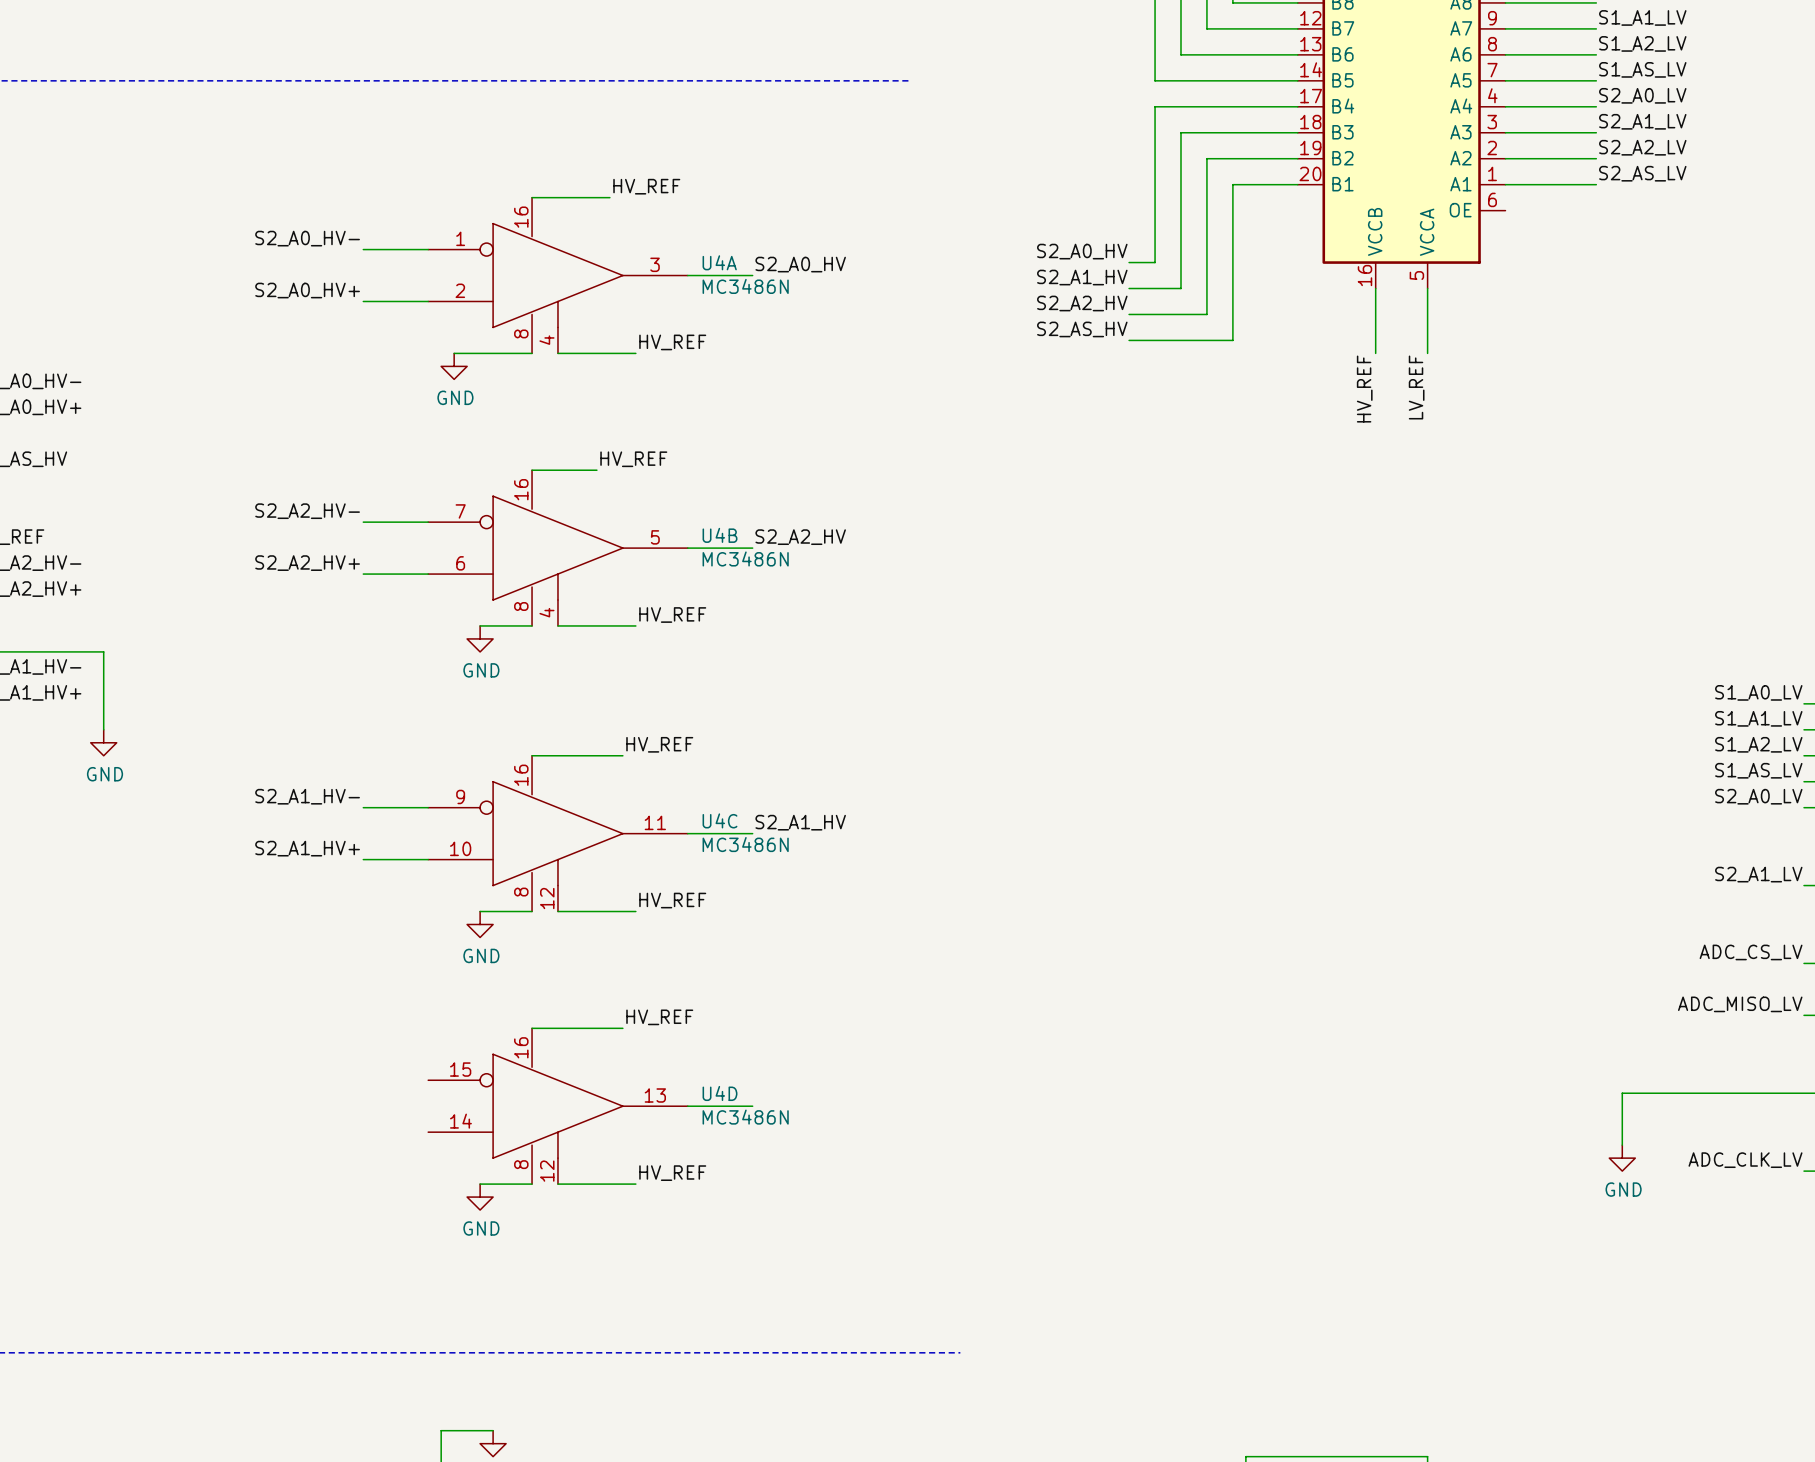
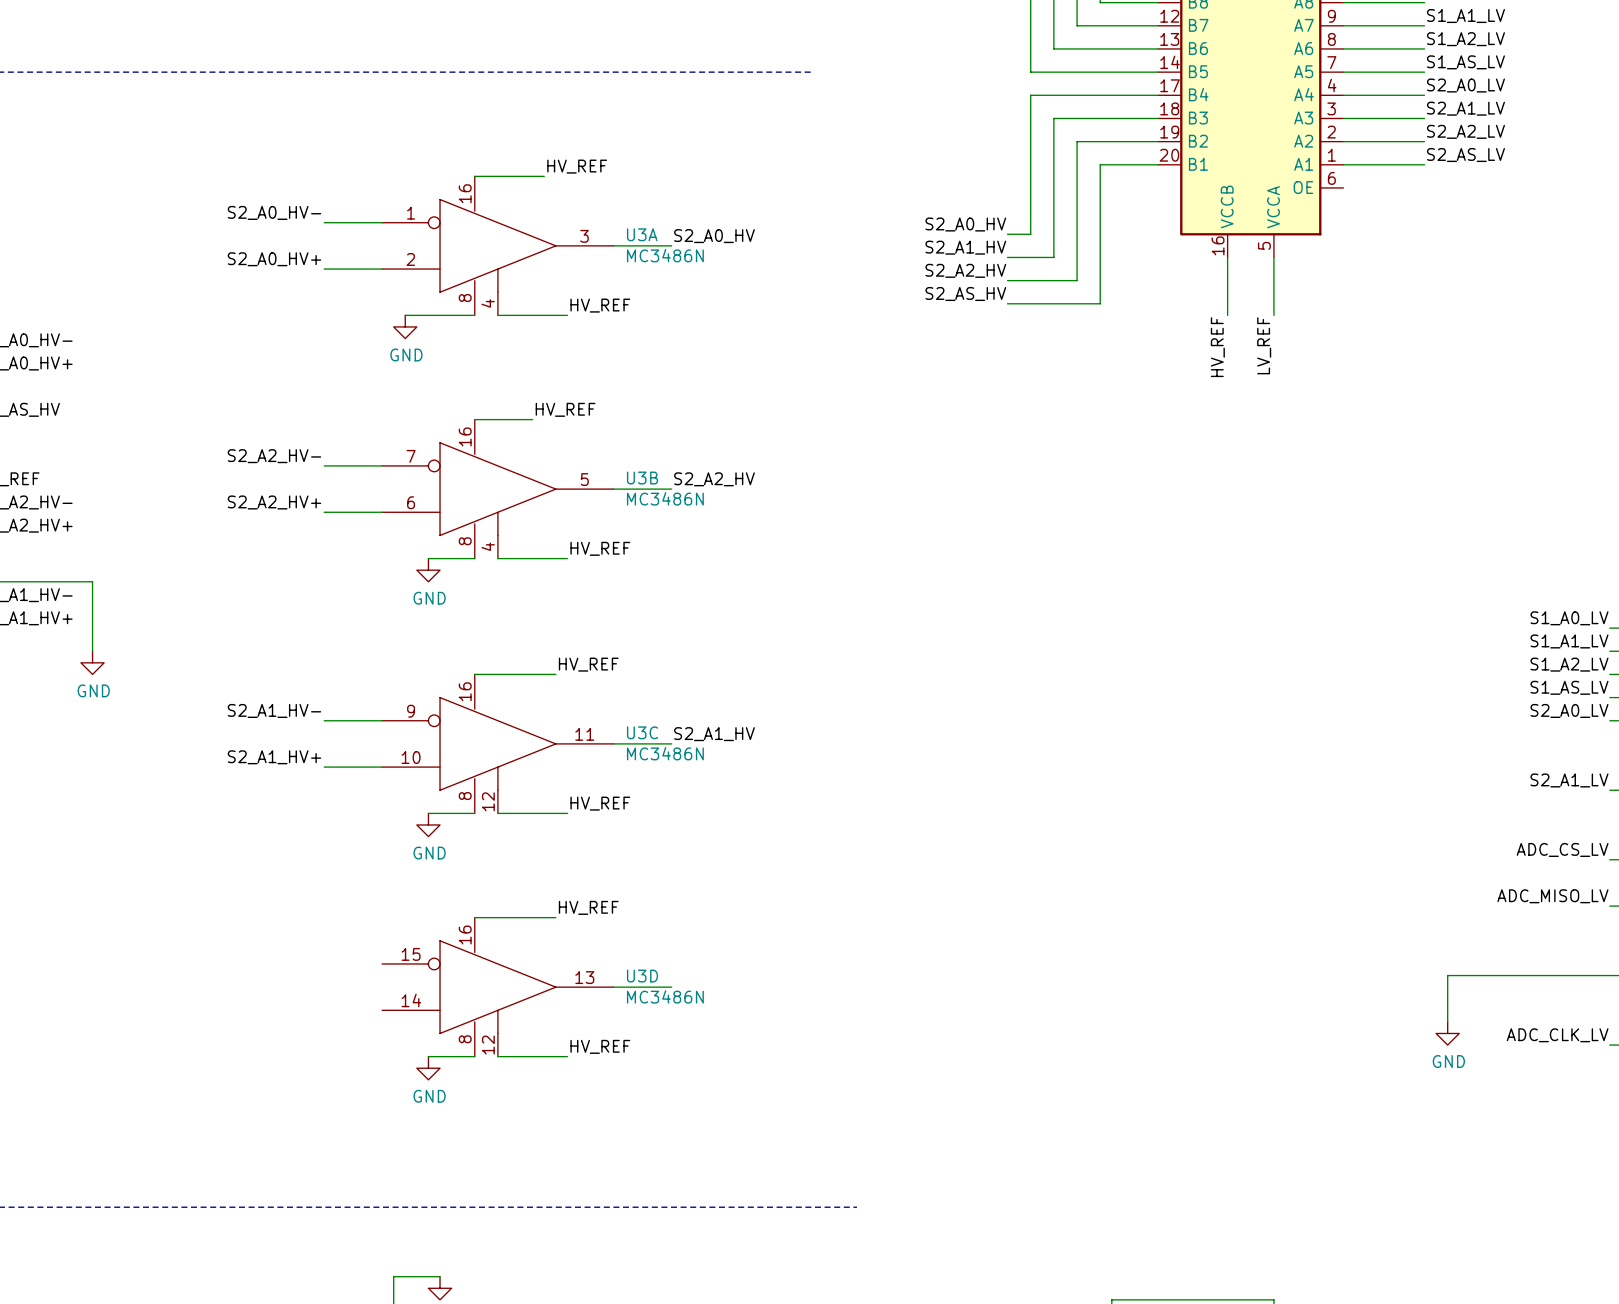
U4A name: U4A (719, 262) -> U3A (642, 234)
U4B name: U4B (720, 535) -> U3B (642, 478)
U4C name: U4C (720, 820) -> U3C (642, 732)
U4D name: U4D (720, 1093) -> U3D (642, 976)

